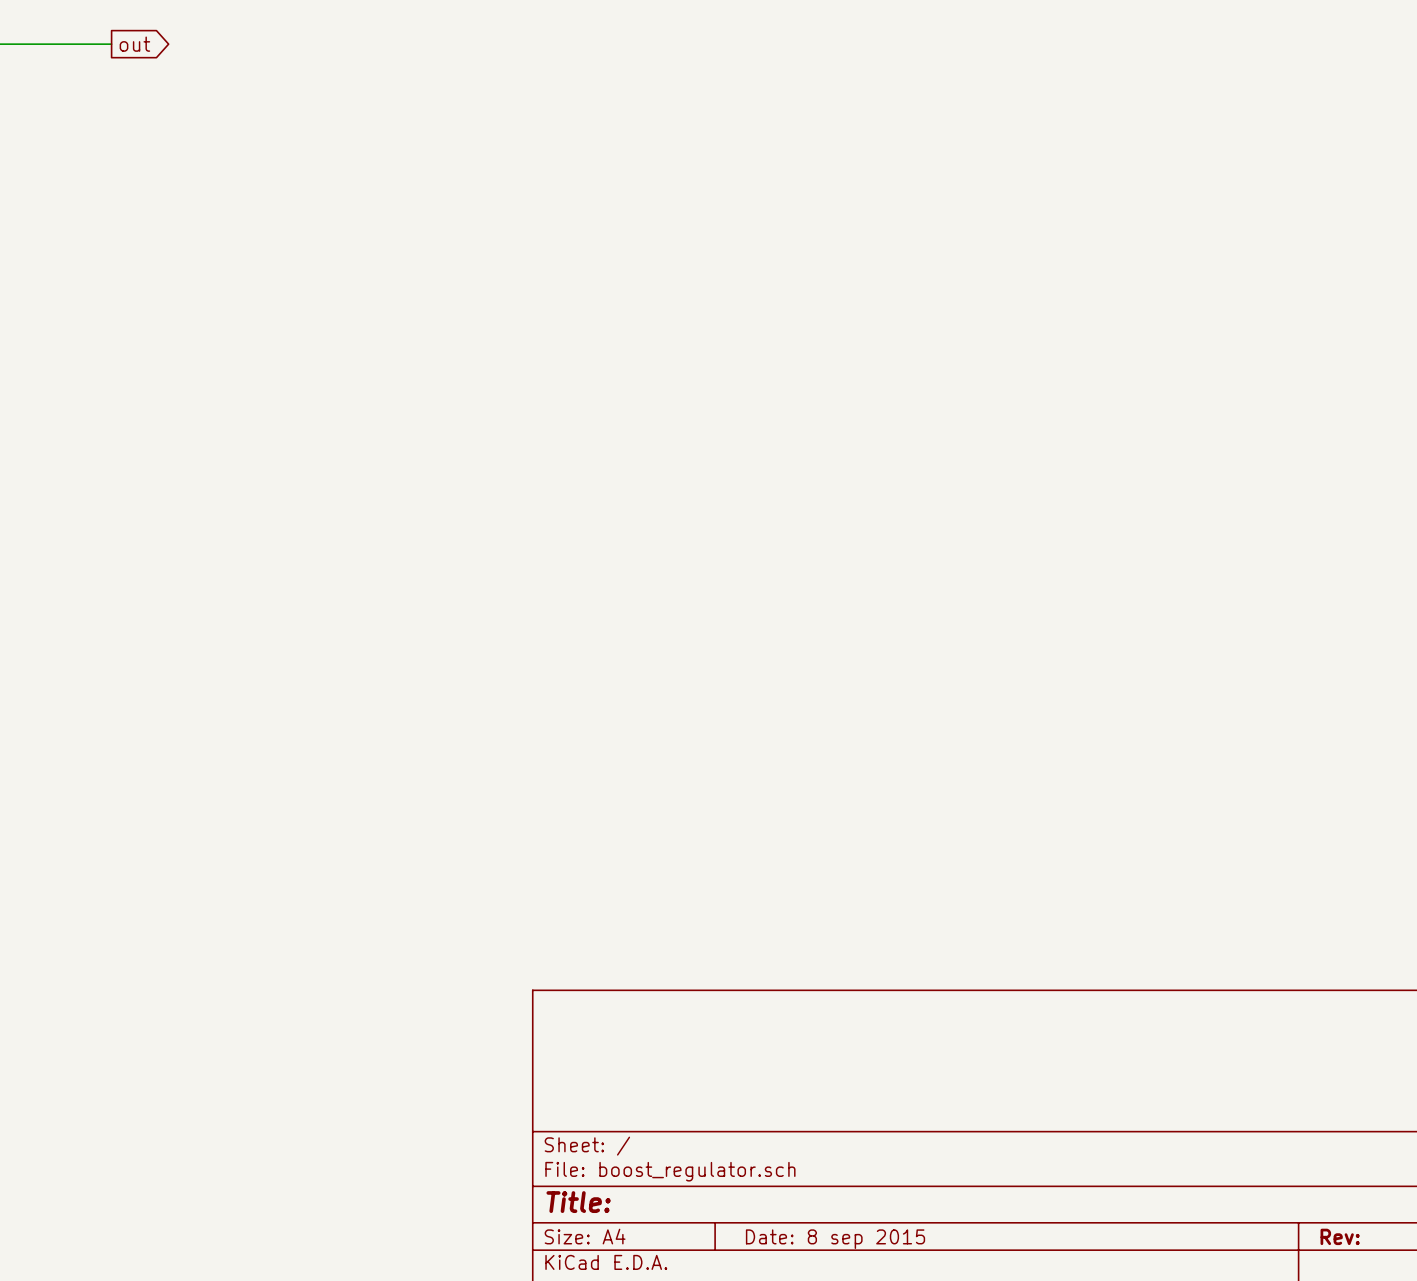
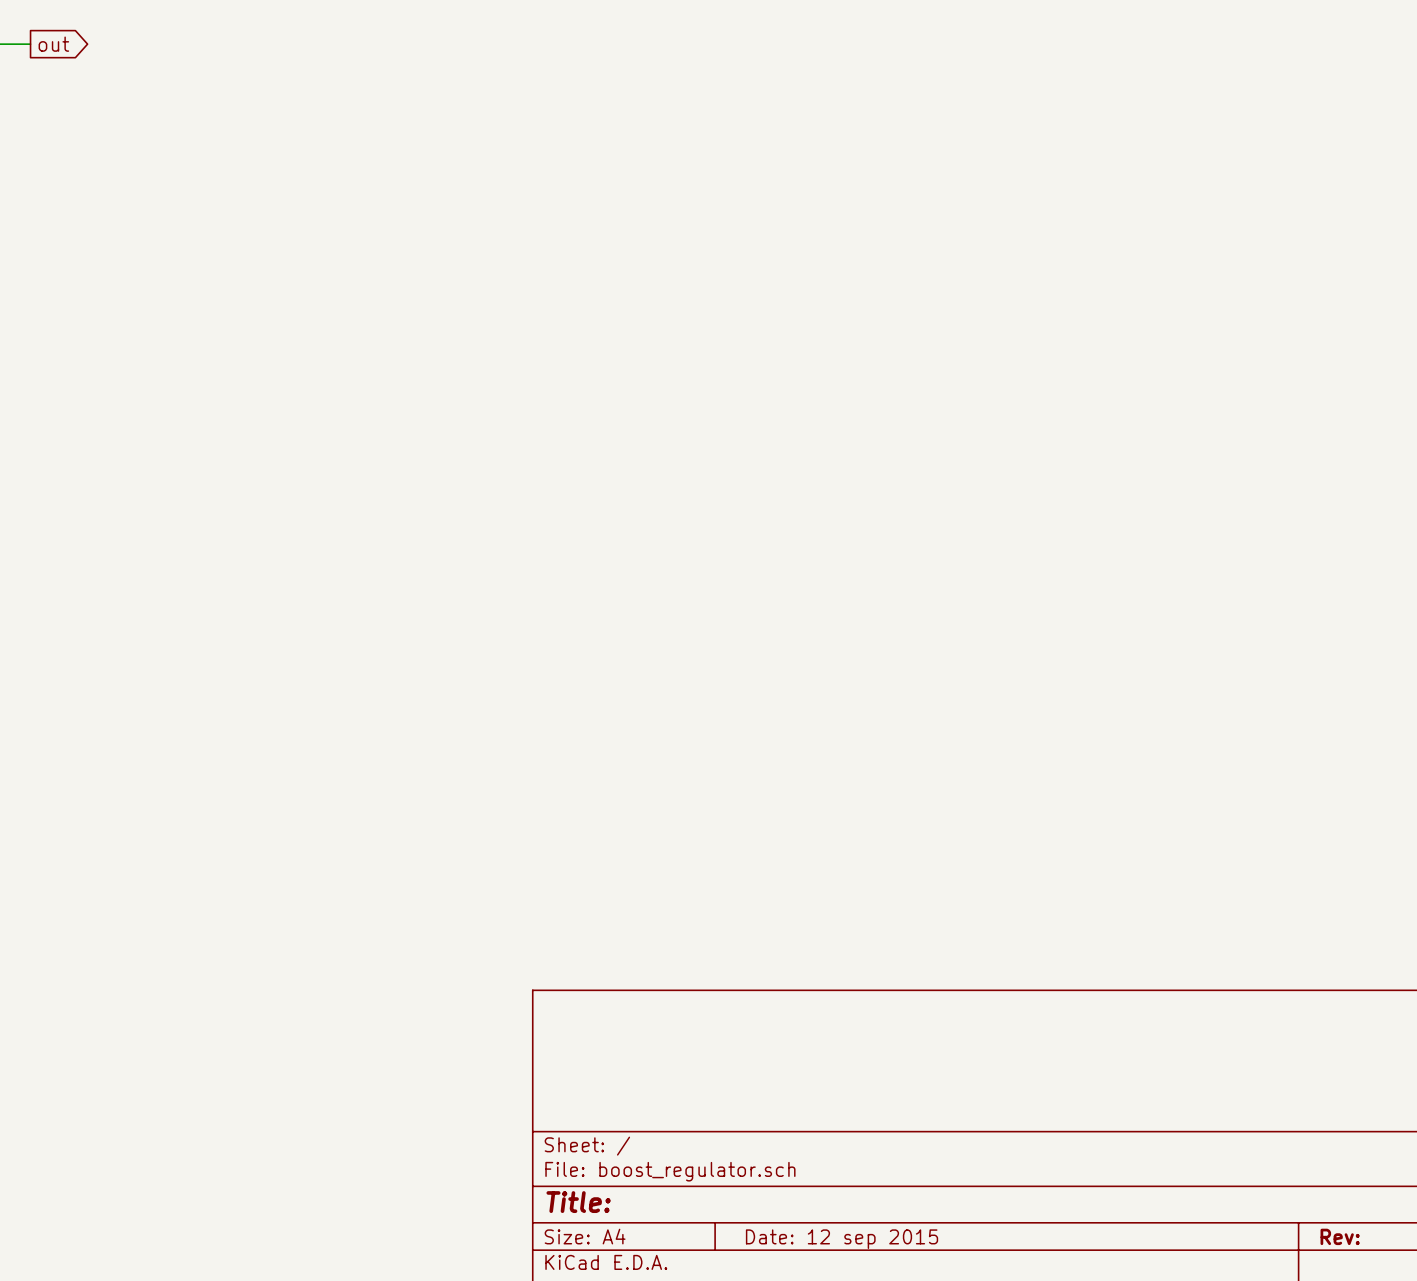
wire: (30, 44) (111, 44) -> none
global label position: out (134, 44) -> out (53, 44)
title block: Date: 8 sep 2015 (835, 1239) -> Date: 12 sep 2015 (842, 1239)

